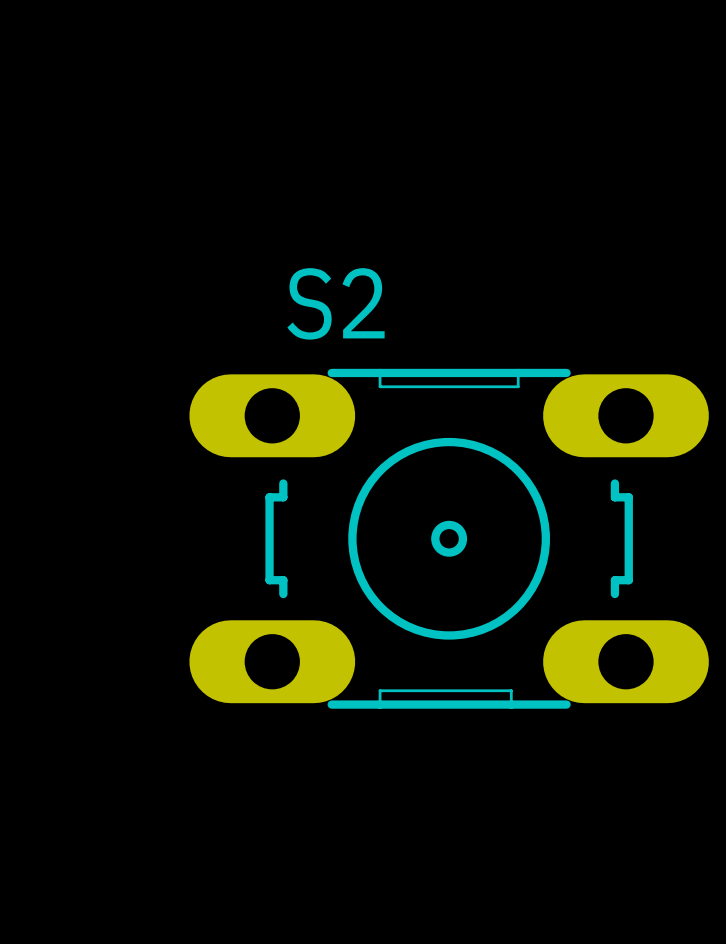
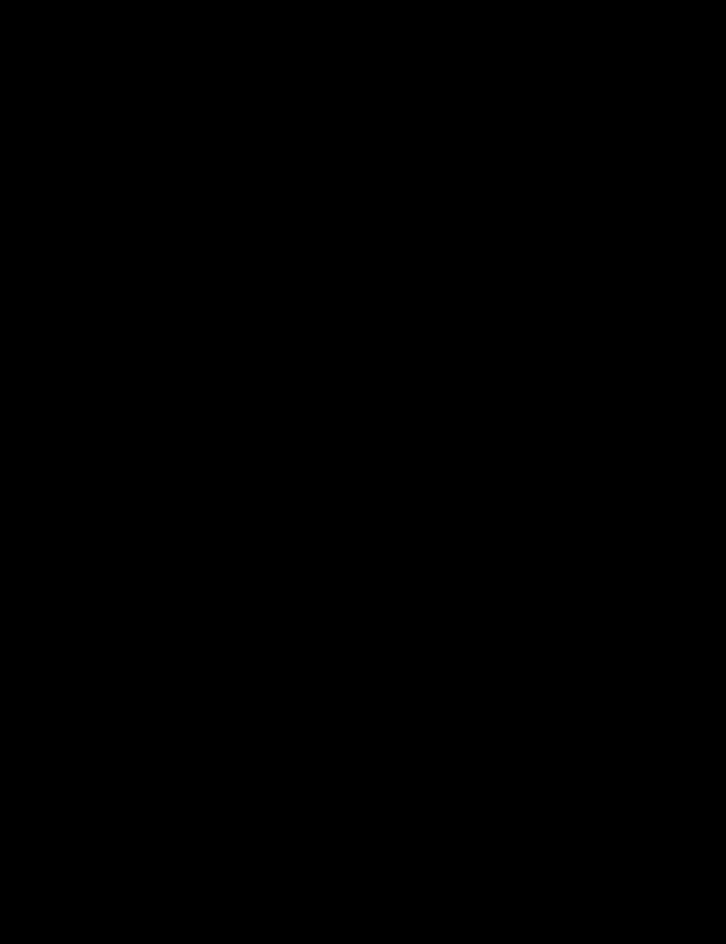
S2: (449, 538) -> none

